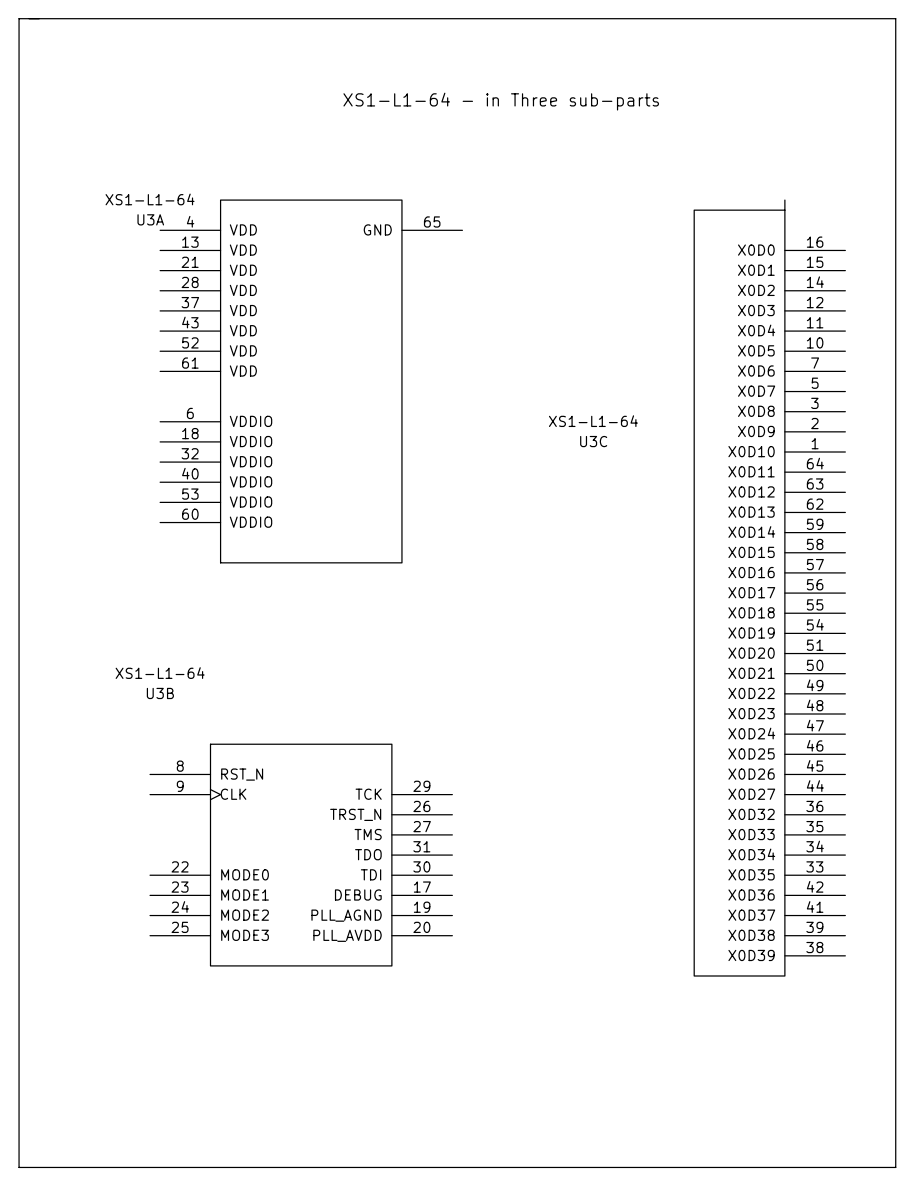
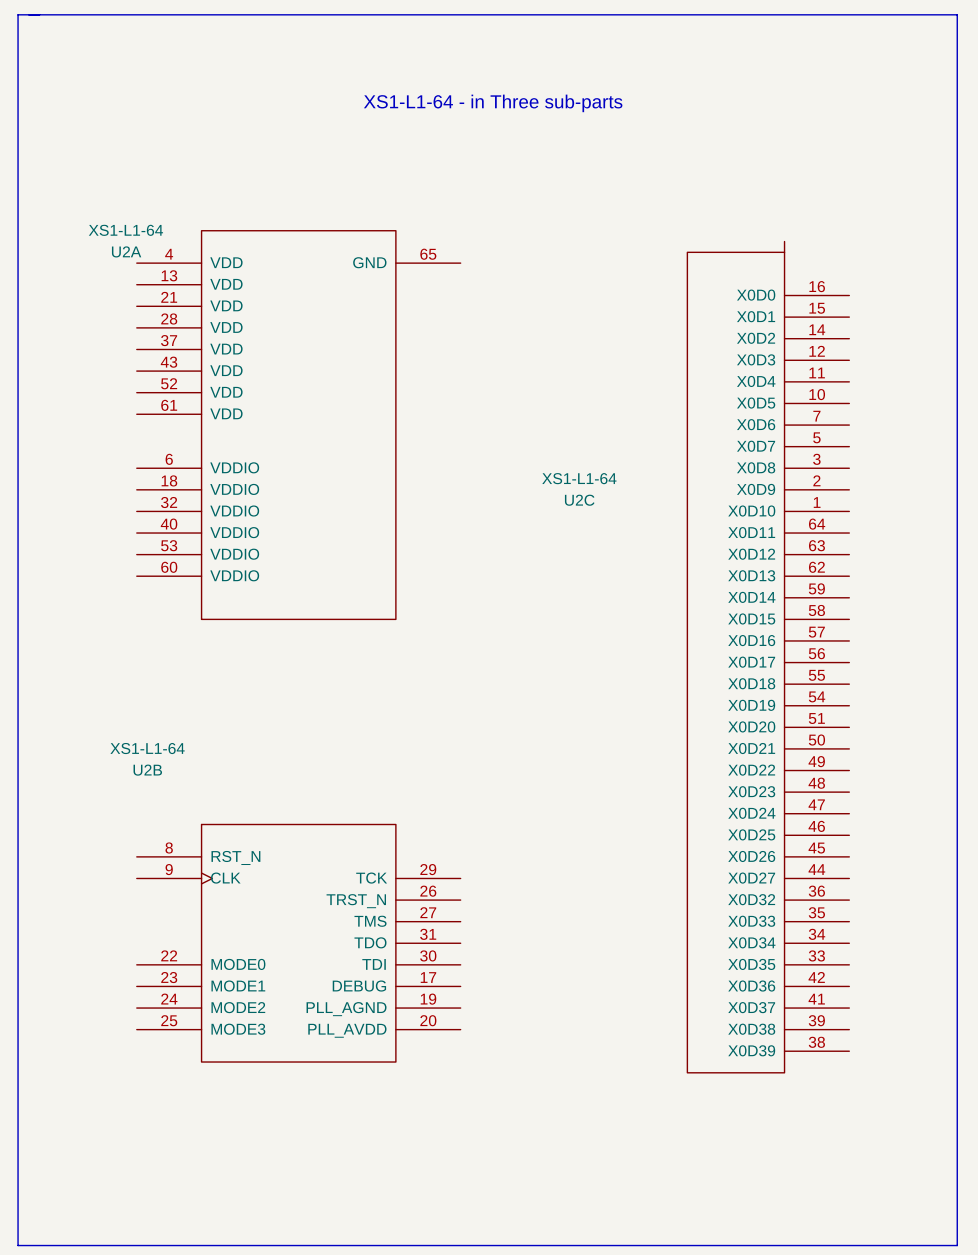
U3A: XS1-L1-64 (311, 381) -> none
U2A: none -> XS1-L1-64 (298, 425)
U3C: XS1-L1-64 (769, 588) -> none
U2C: none -> XS1-L1-64 (768, 657)
U3B: XS1-L1-64 (301, 855) -> none
U2B: none -> XS1-L1-64 (298, 943)

